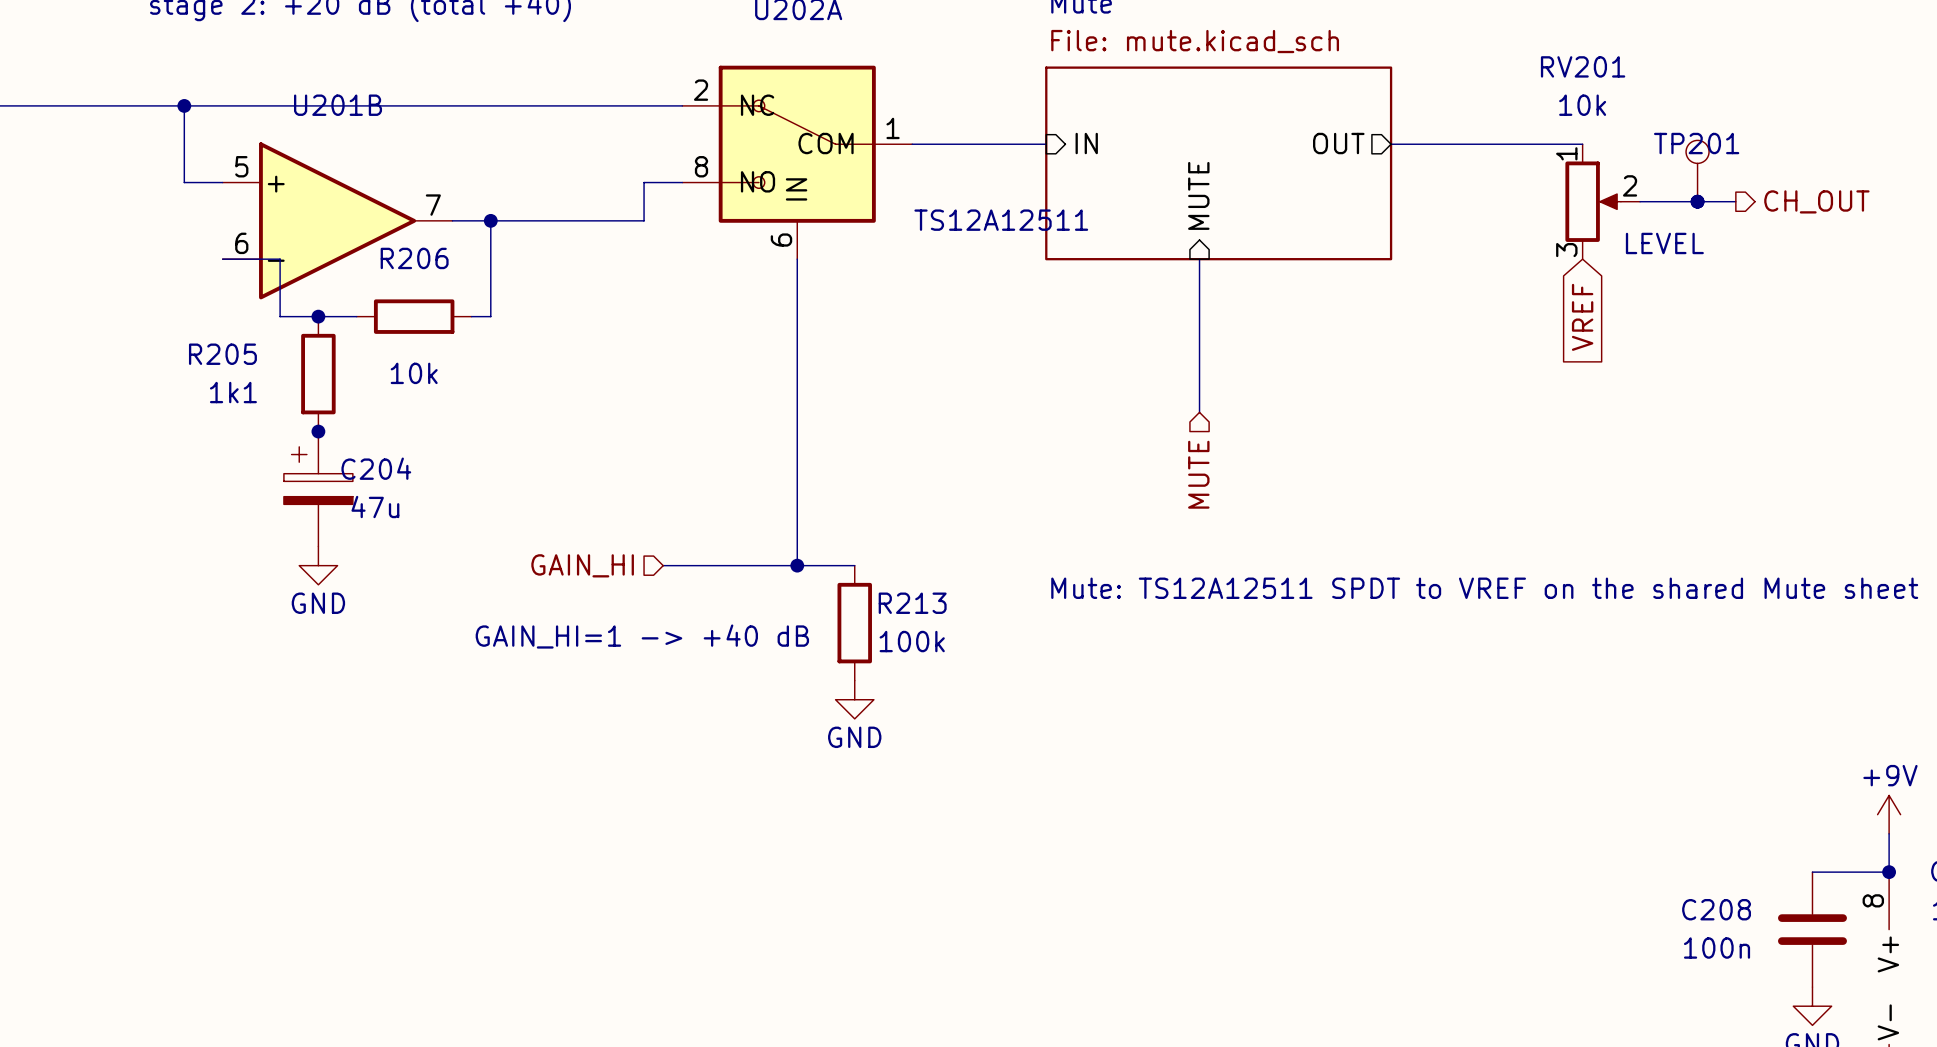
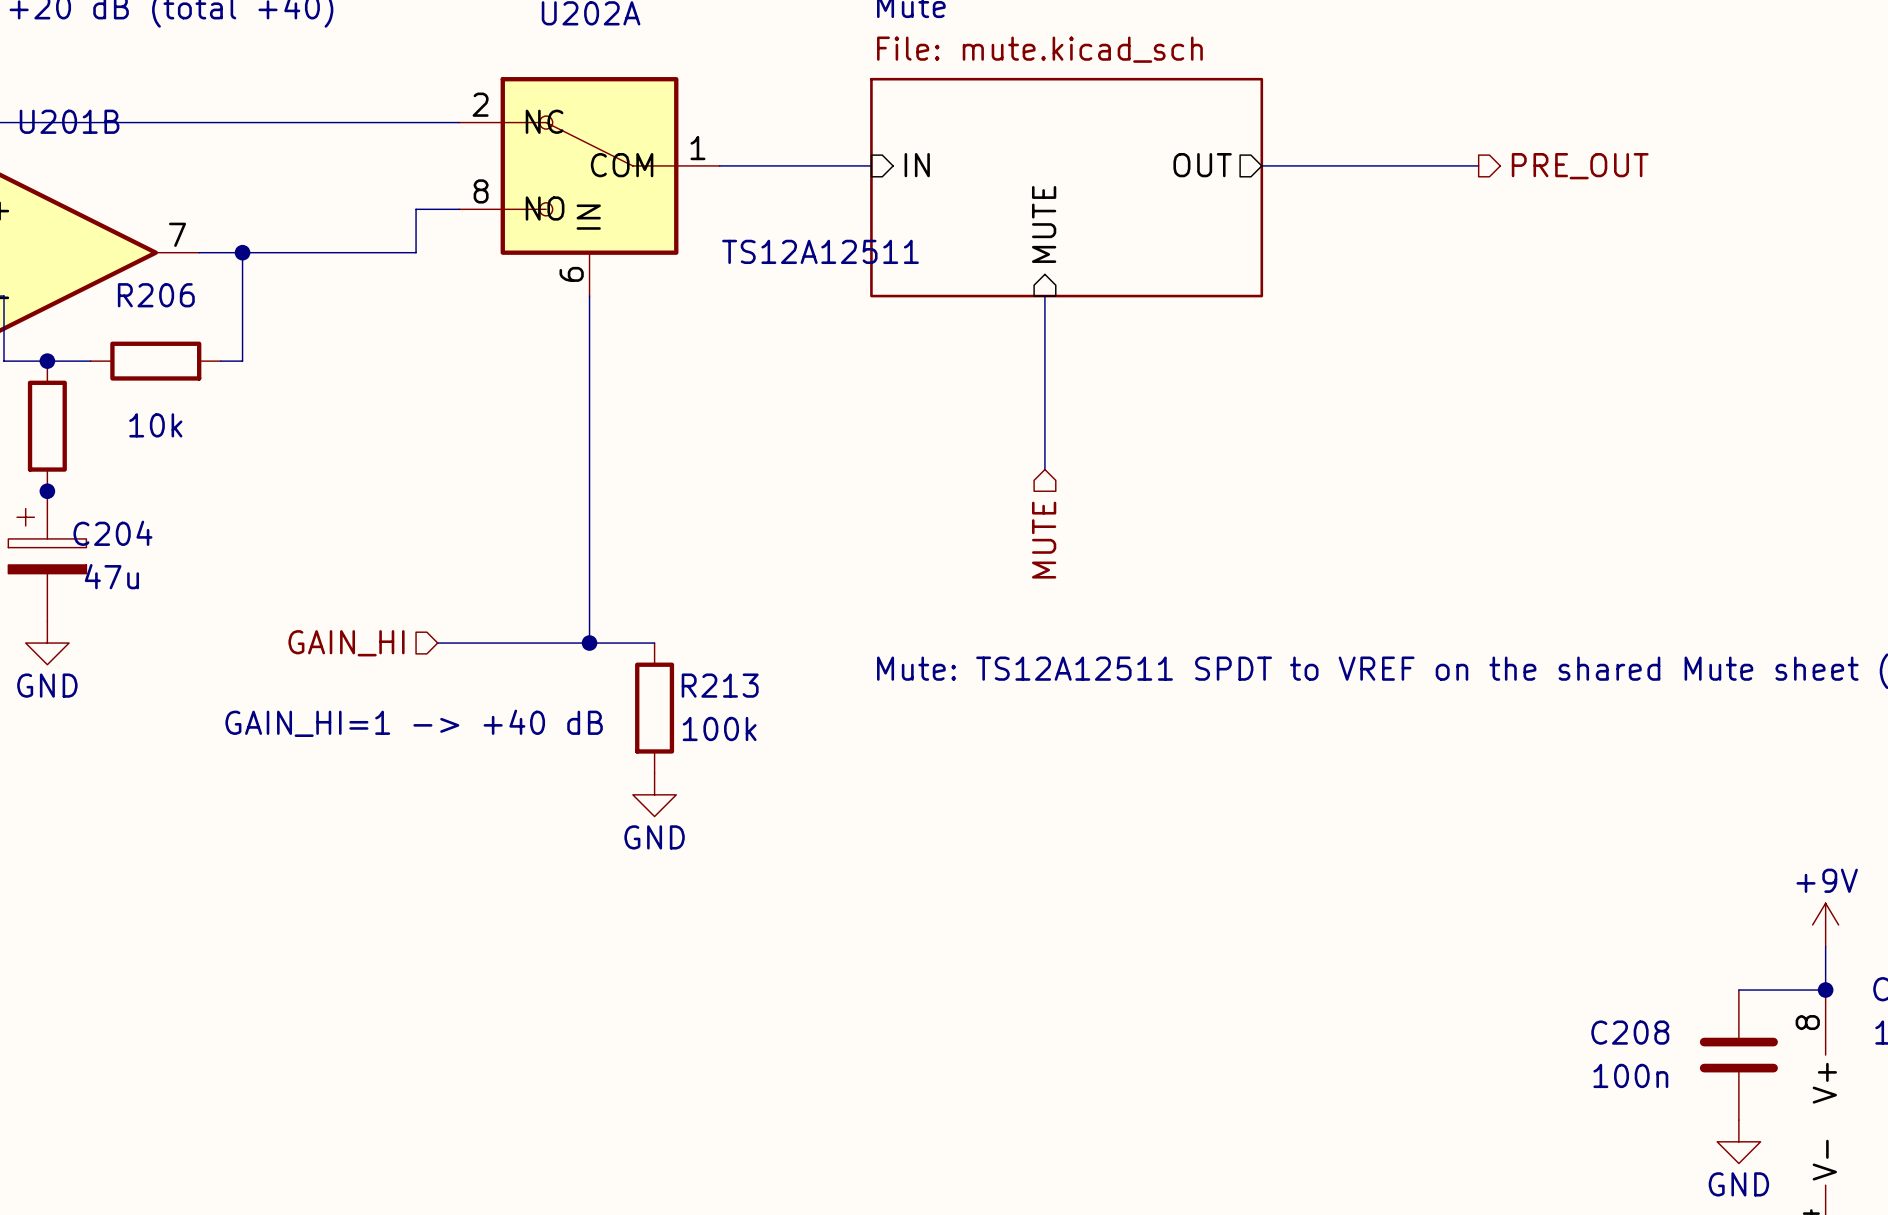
hierarchical label: none -> PRE_OUT (1580, 166)
TP201: (1697, 171) -> none
RV201: 10k (1602, 201) -> none
wire: (1640, 201) (1735, 201) -> none
junction: (1697, 201) -> none
hierarchical label: CH_OUT (1816, 201) -> none
text: LEVEL (1664, 243) -> none
global label: VREF (1582, 317) -> none

